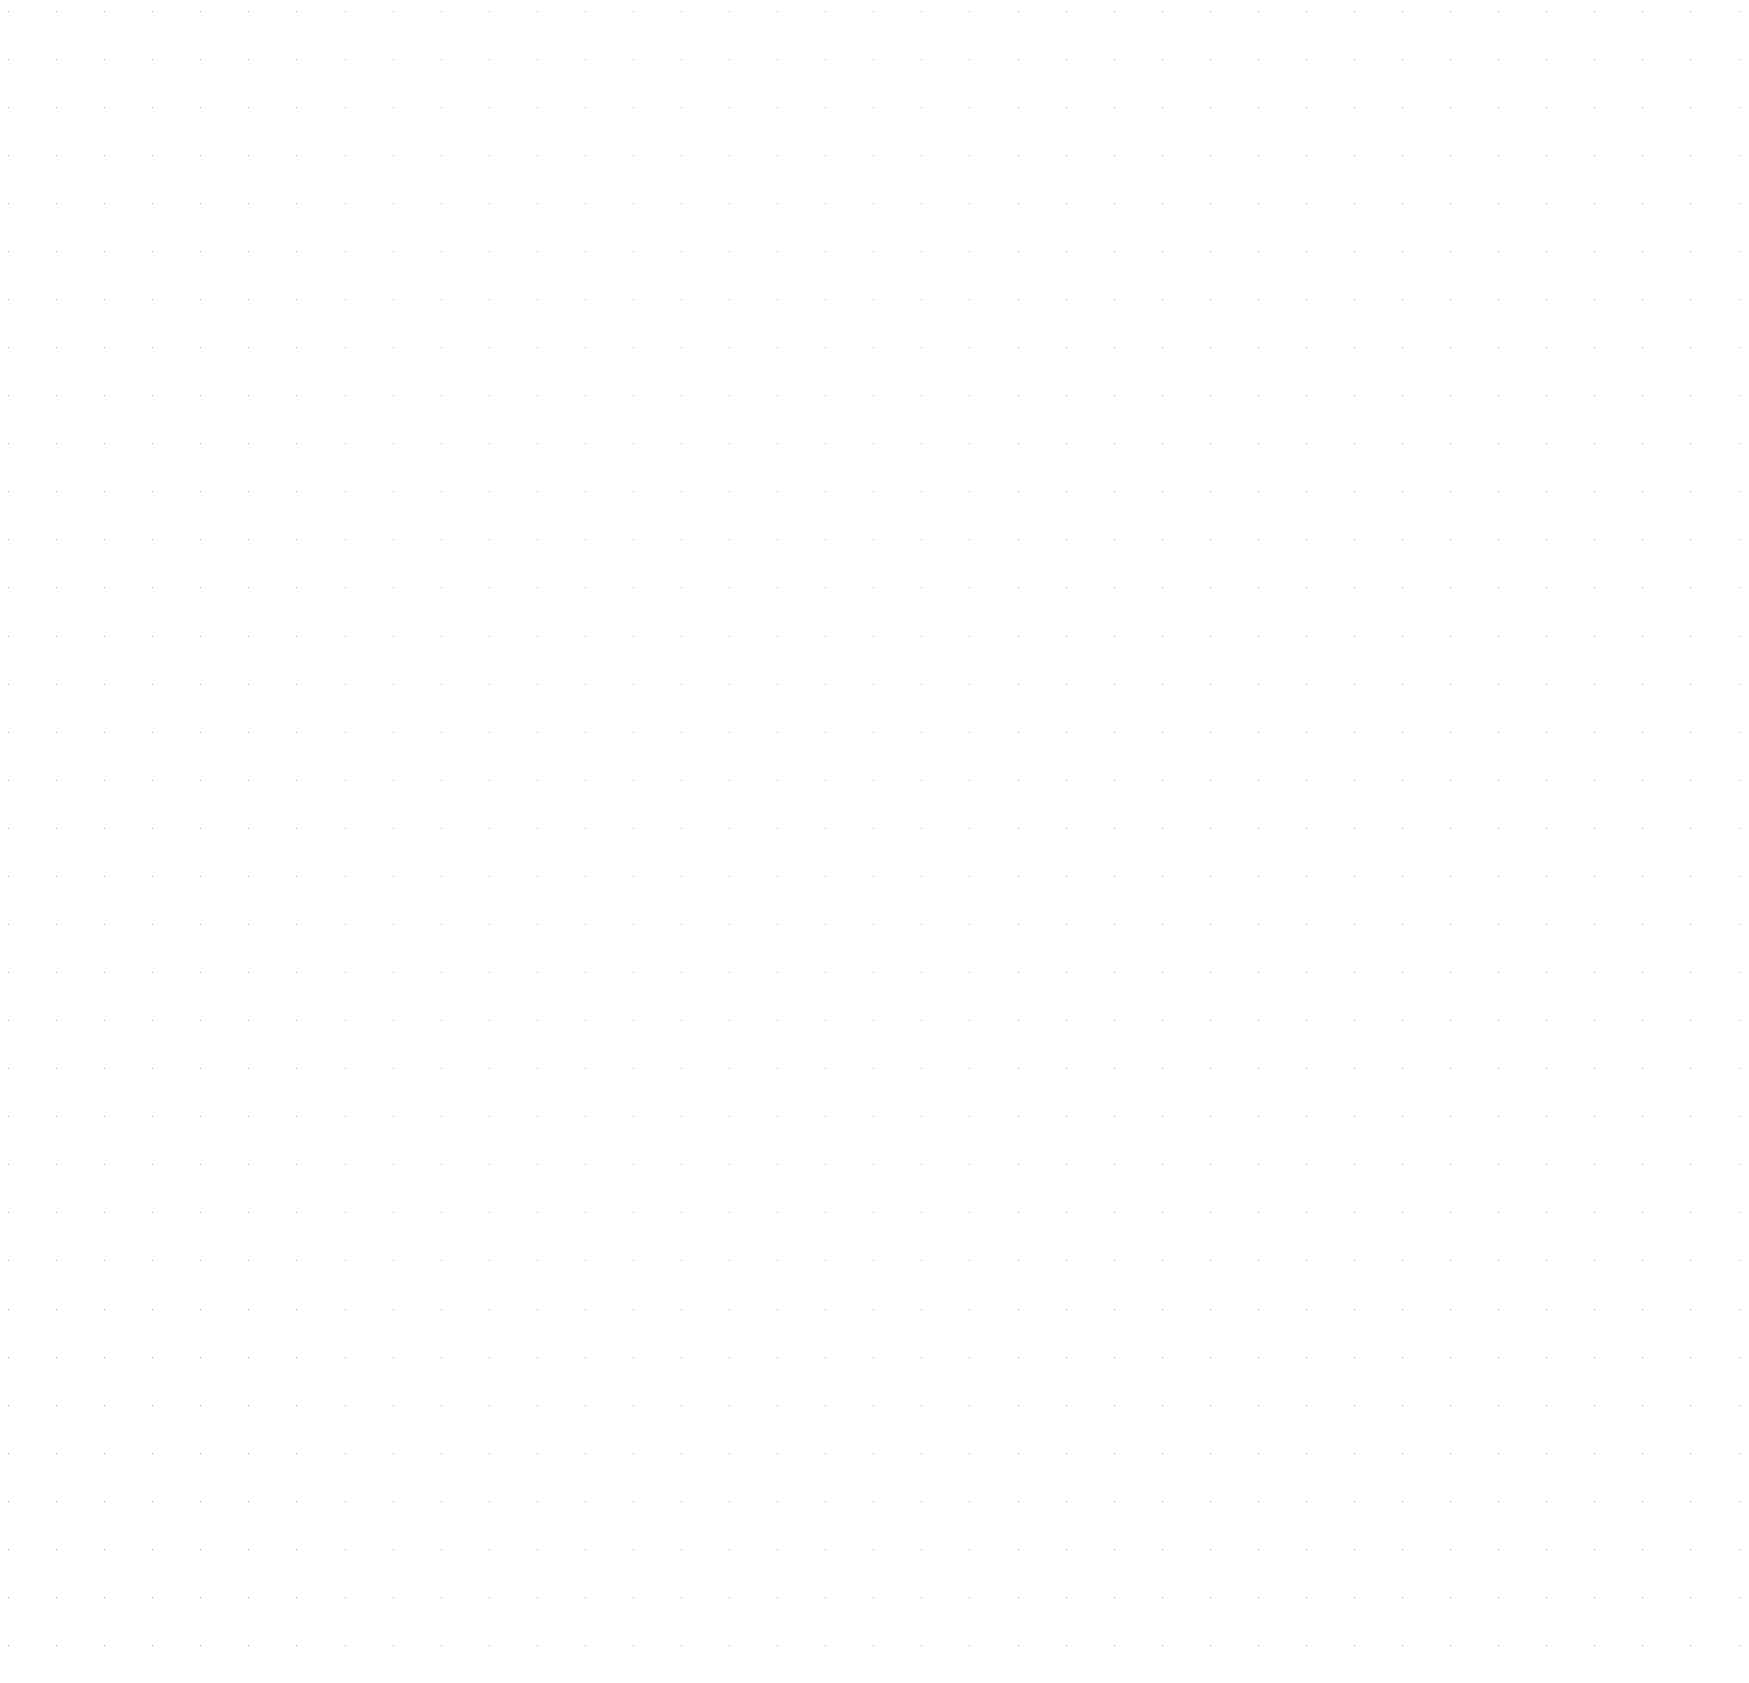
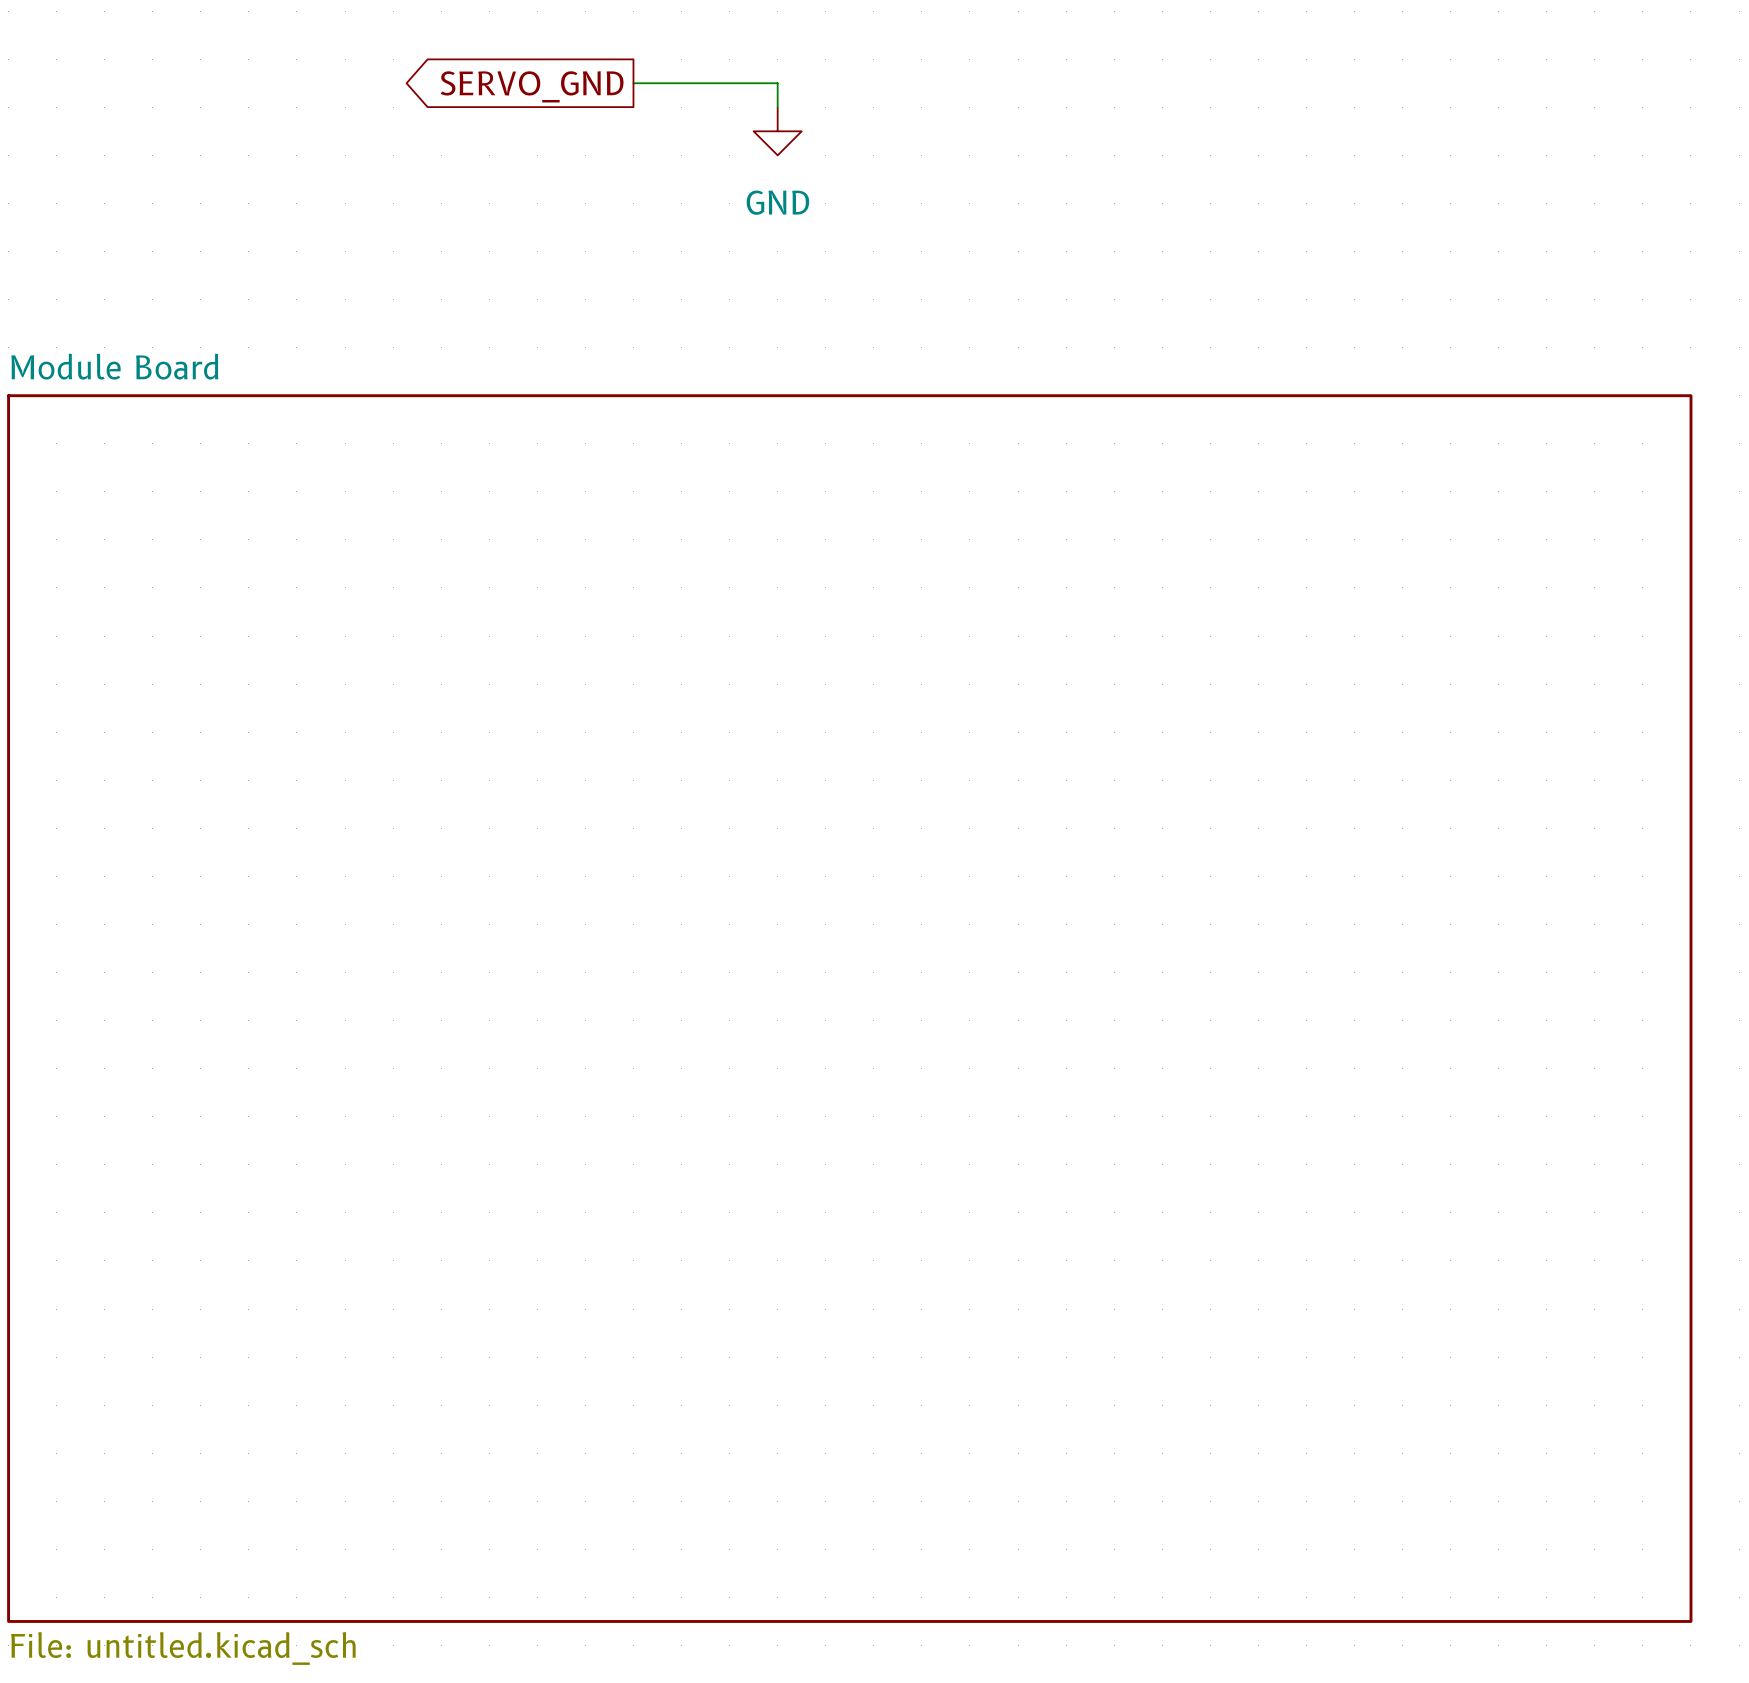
wire: none -> (633, 83) (777, 83) (777, 107)
global label: none -> SERVO_GND (532, 86)
power symbol: none -> GND (777, 131)
sheet Module Board: none -> File: untitled.kicad_sch (849, 1008)

